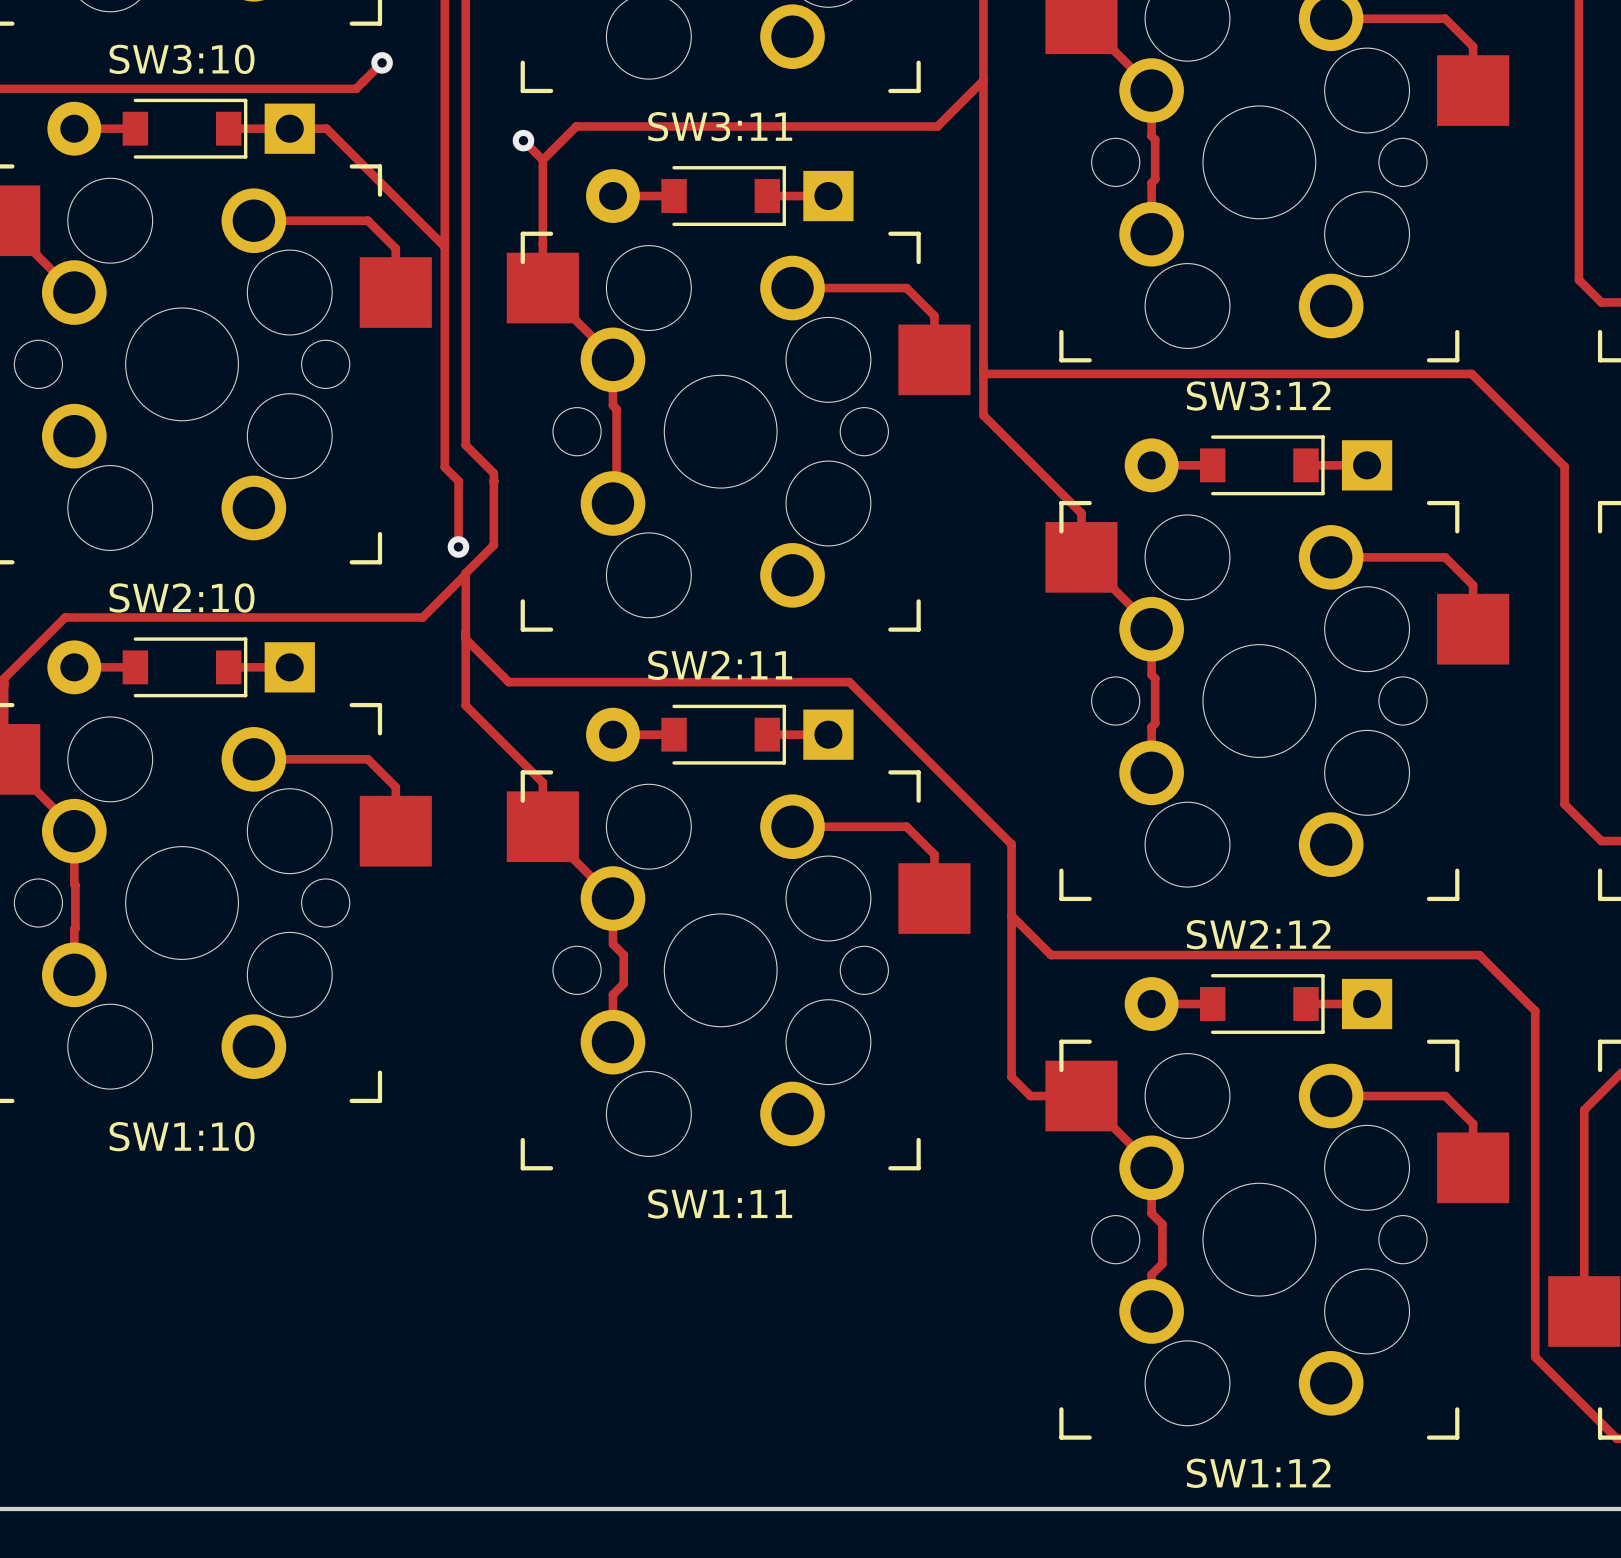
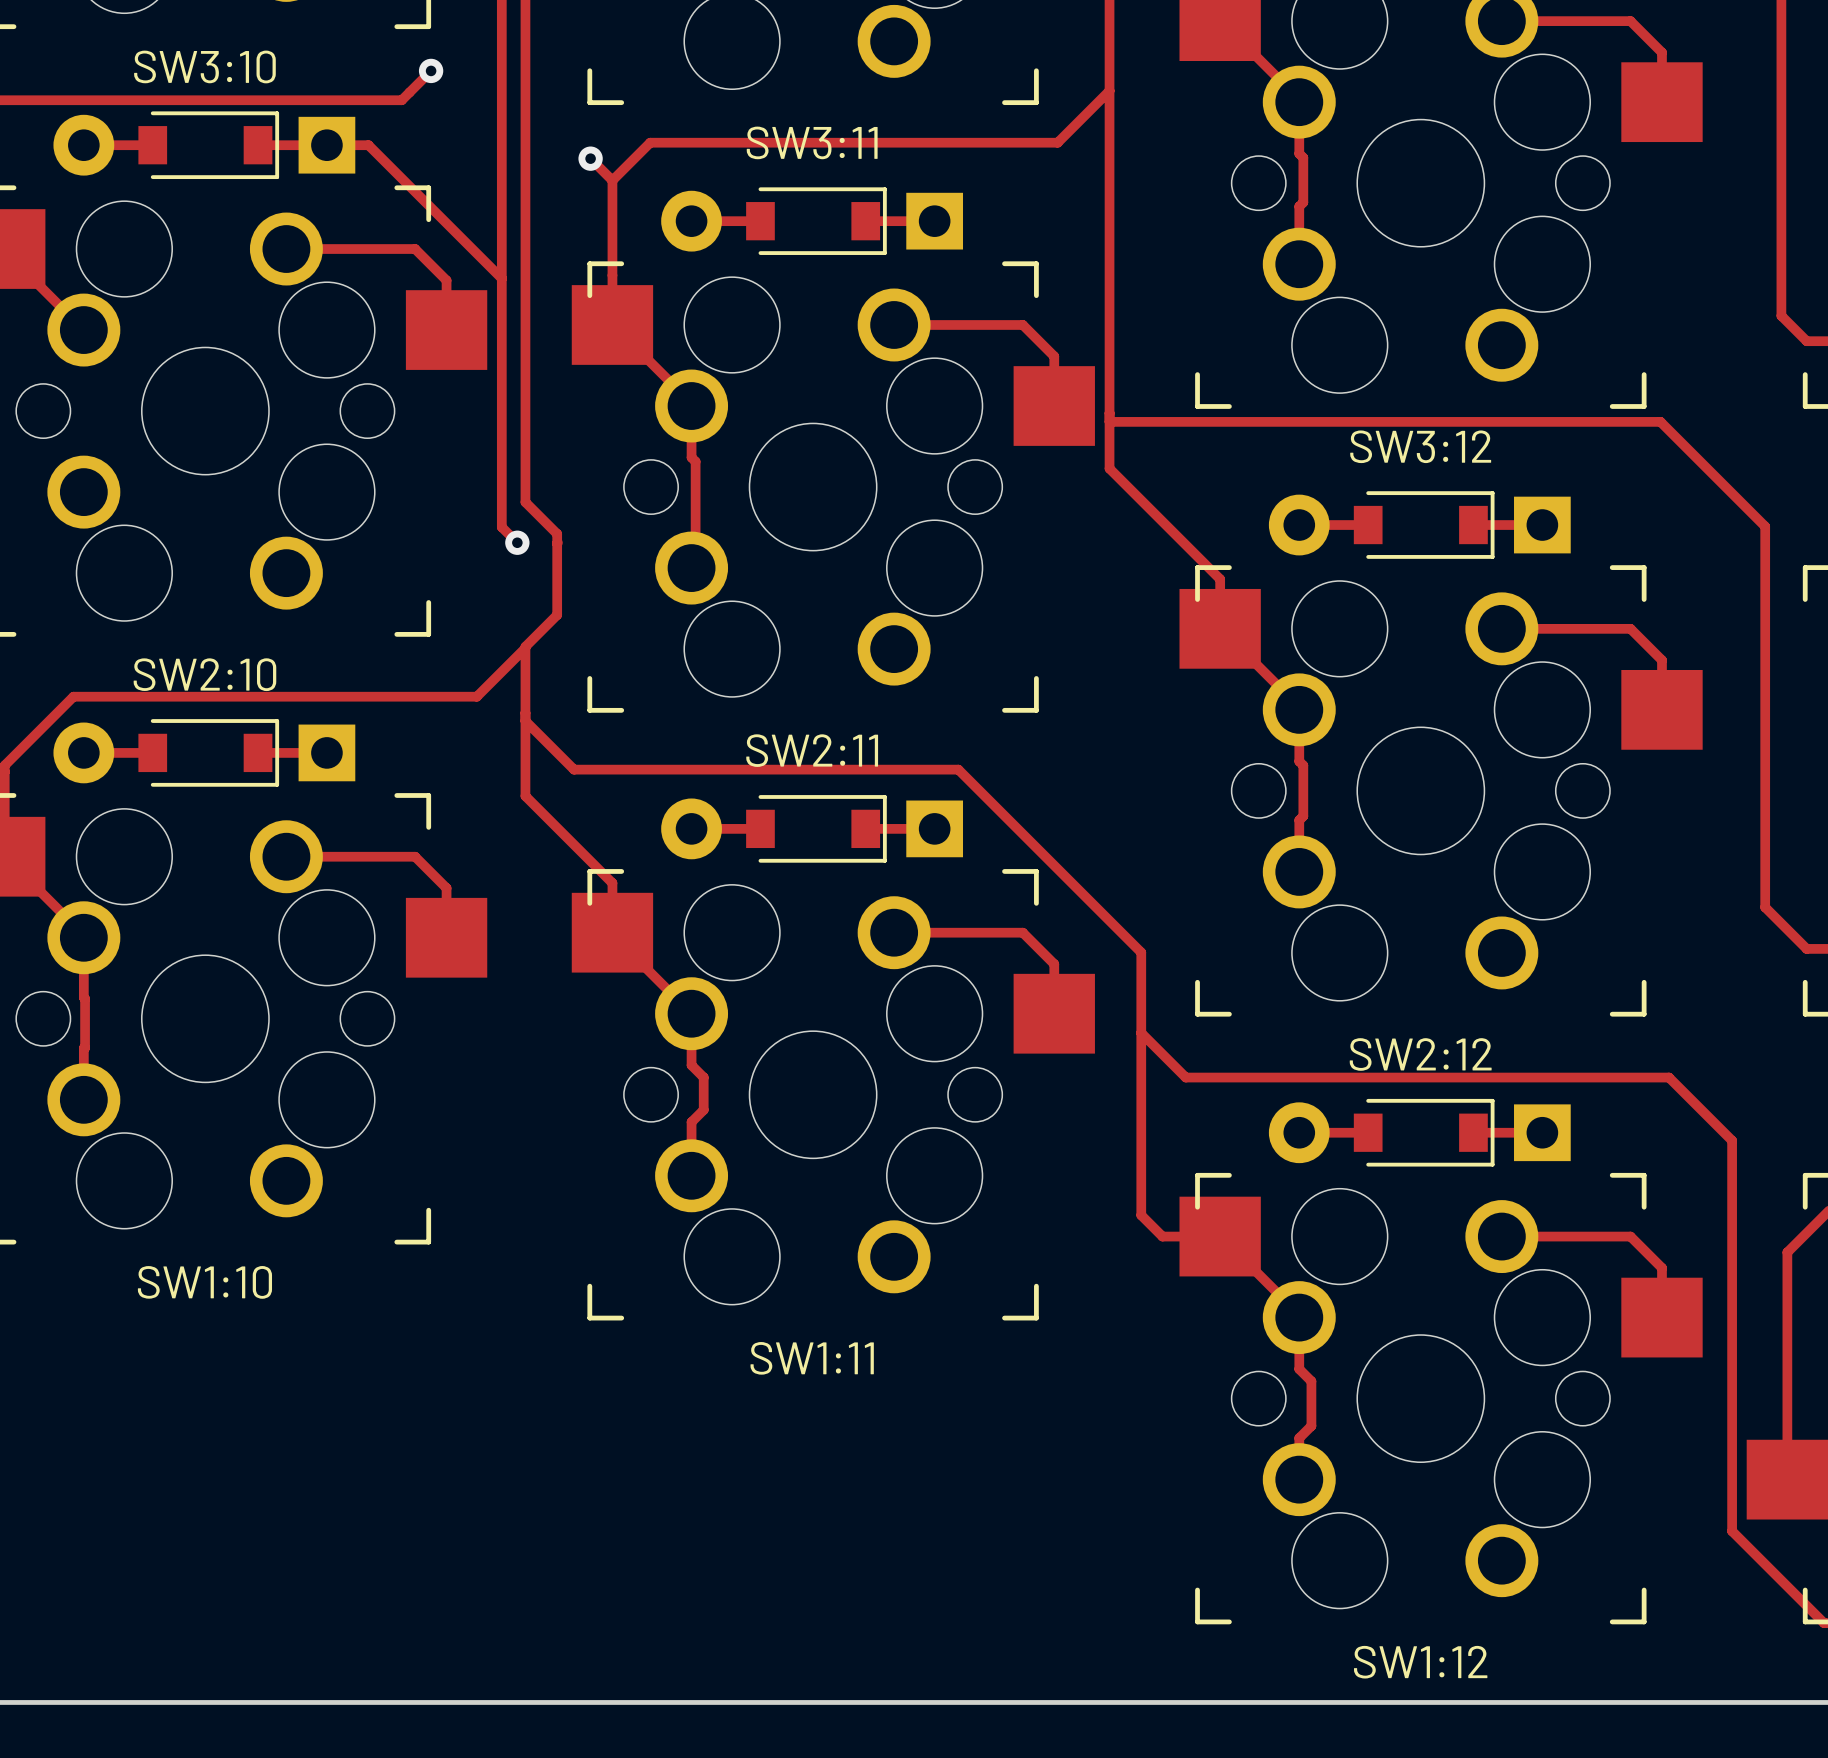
track: (458, 481) (458, 546) -> none
via position: (458, 546) -> (517, 542)

